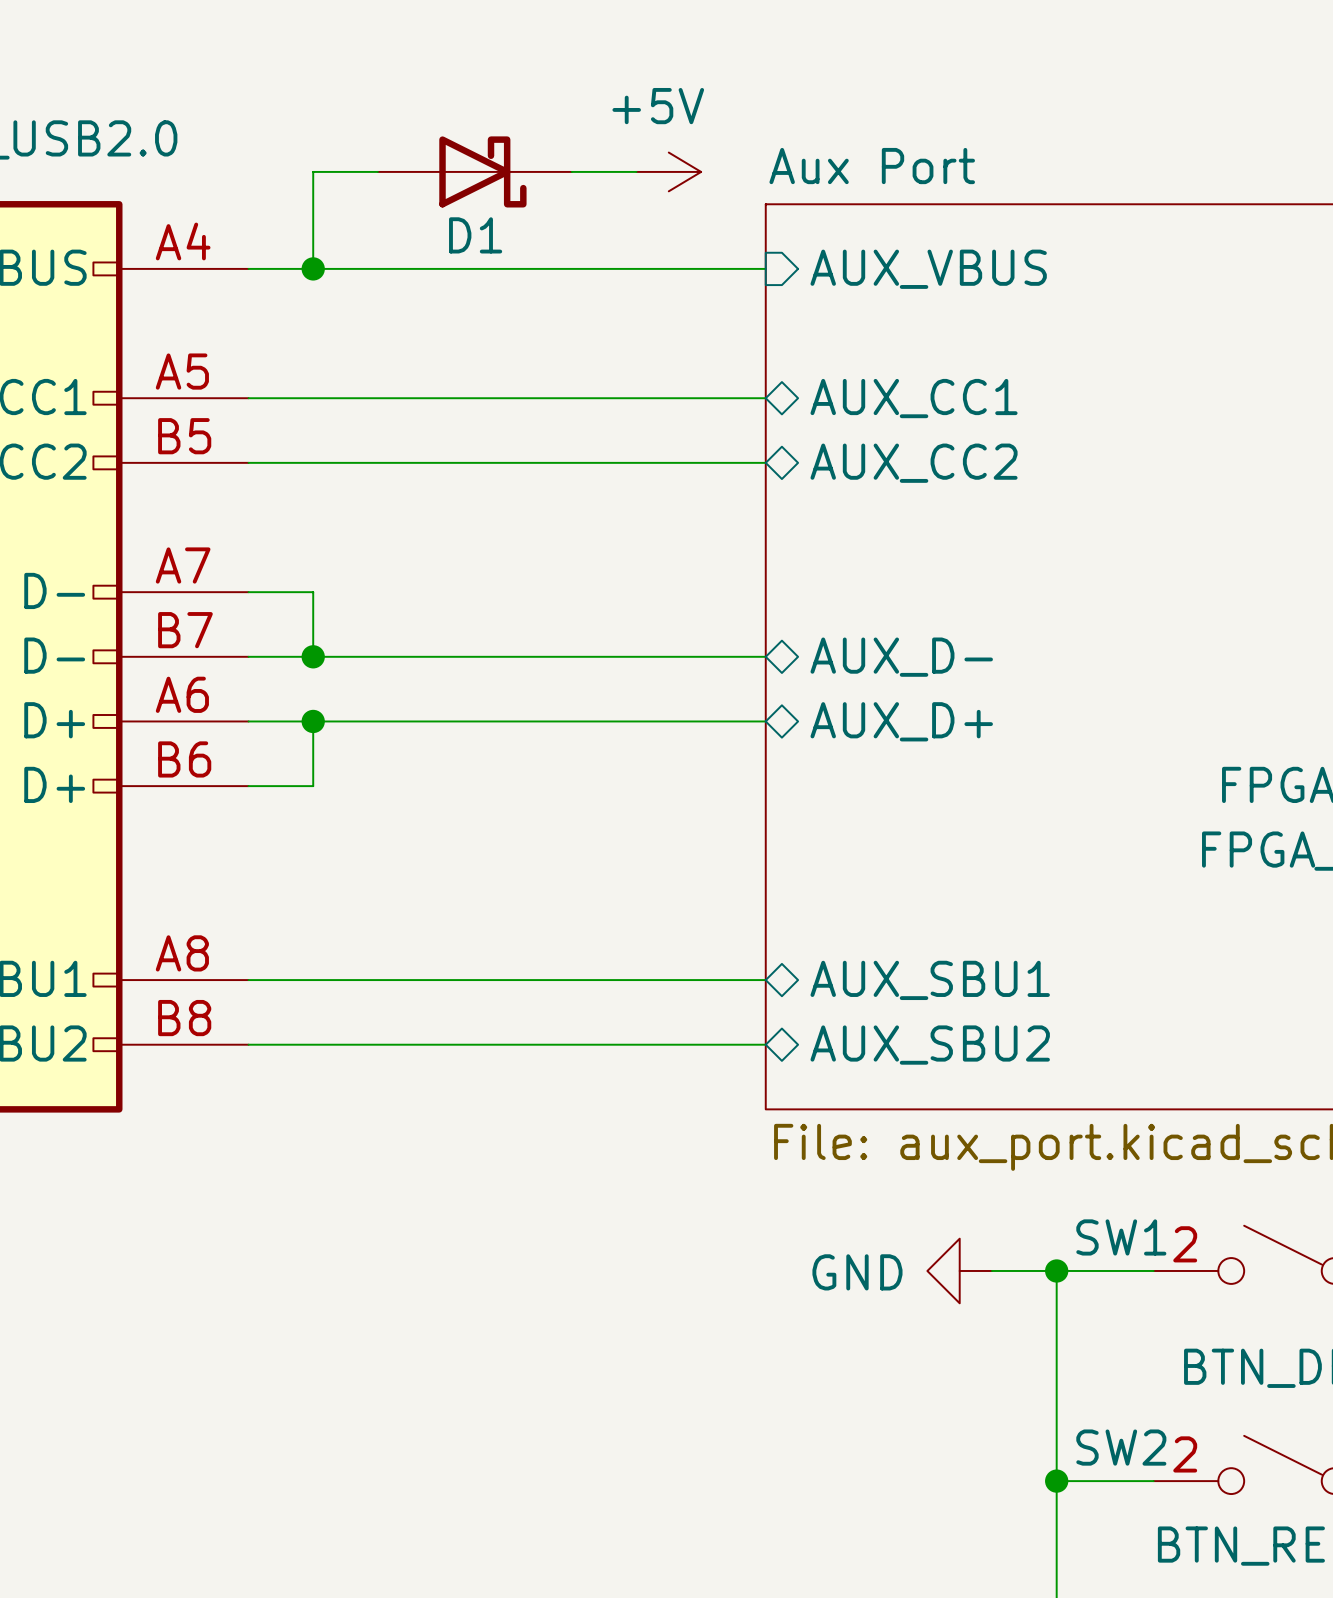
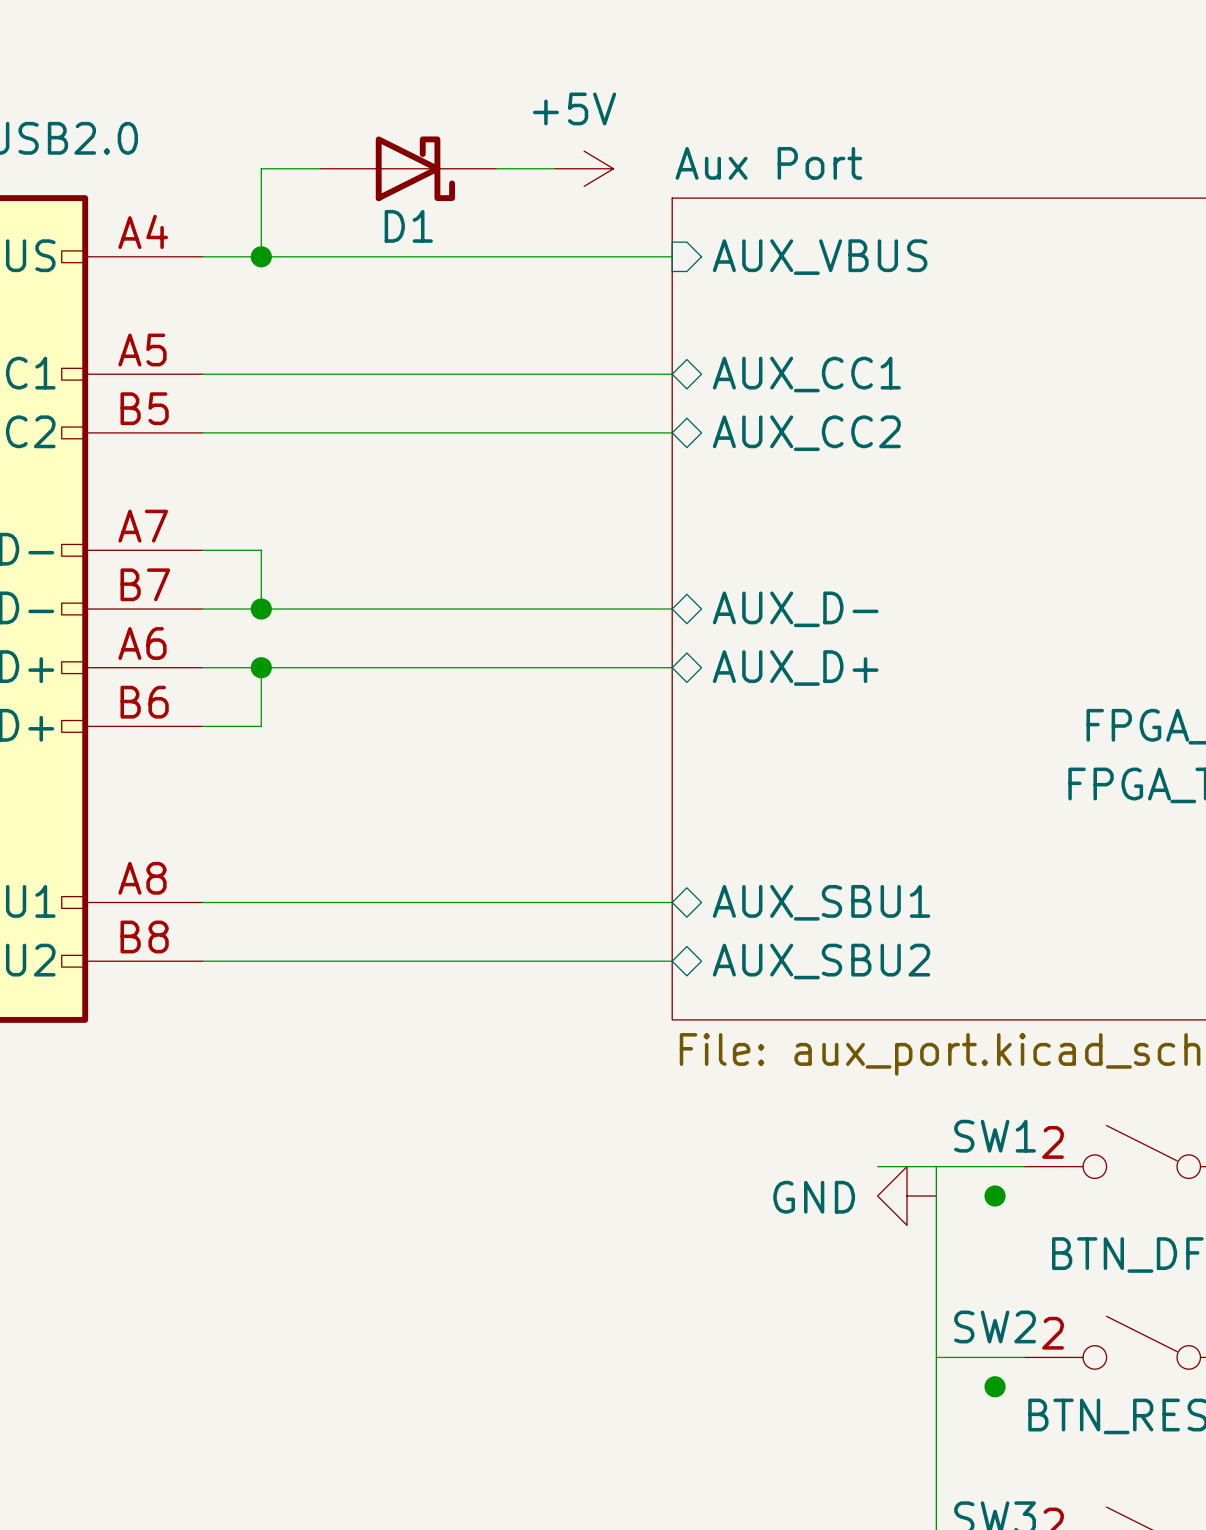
power symbol position: GND (959, 1270) -> GND (907, 1196)
junction position: (1056, 1270) -> (995, 1196)
junction position: (1056, 1481) -> (995, 1386)

